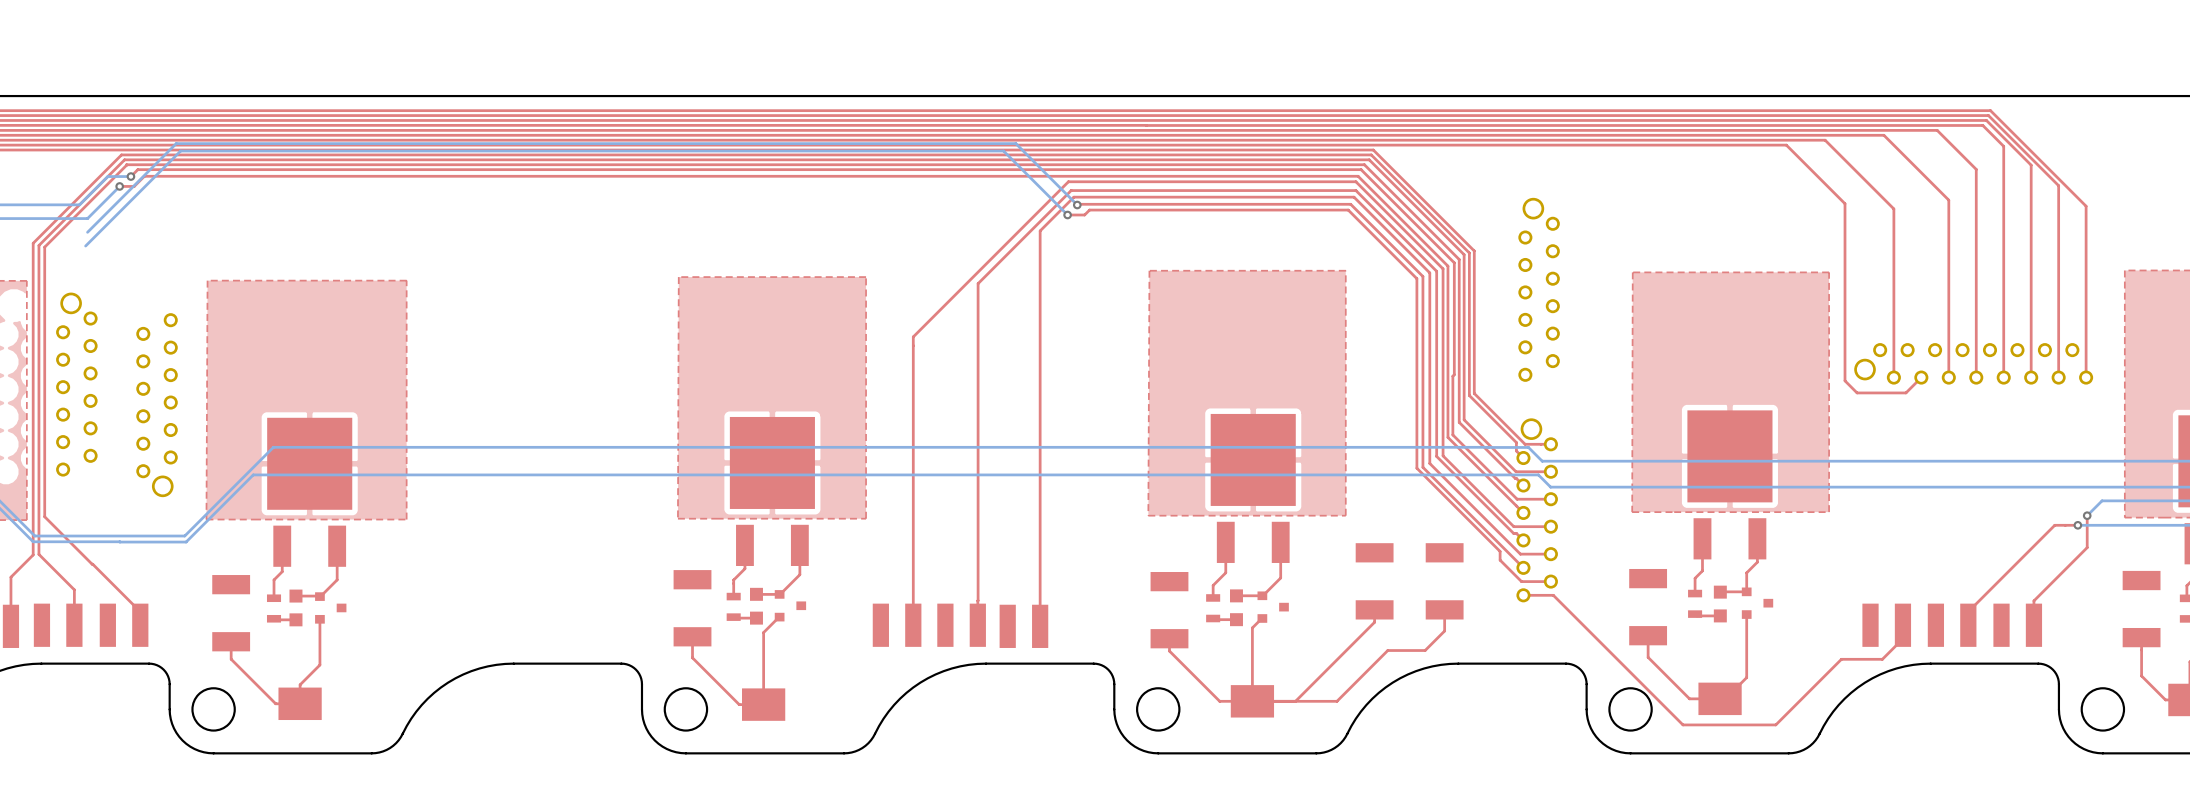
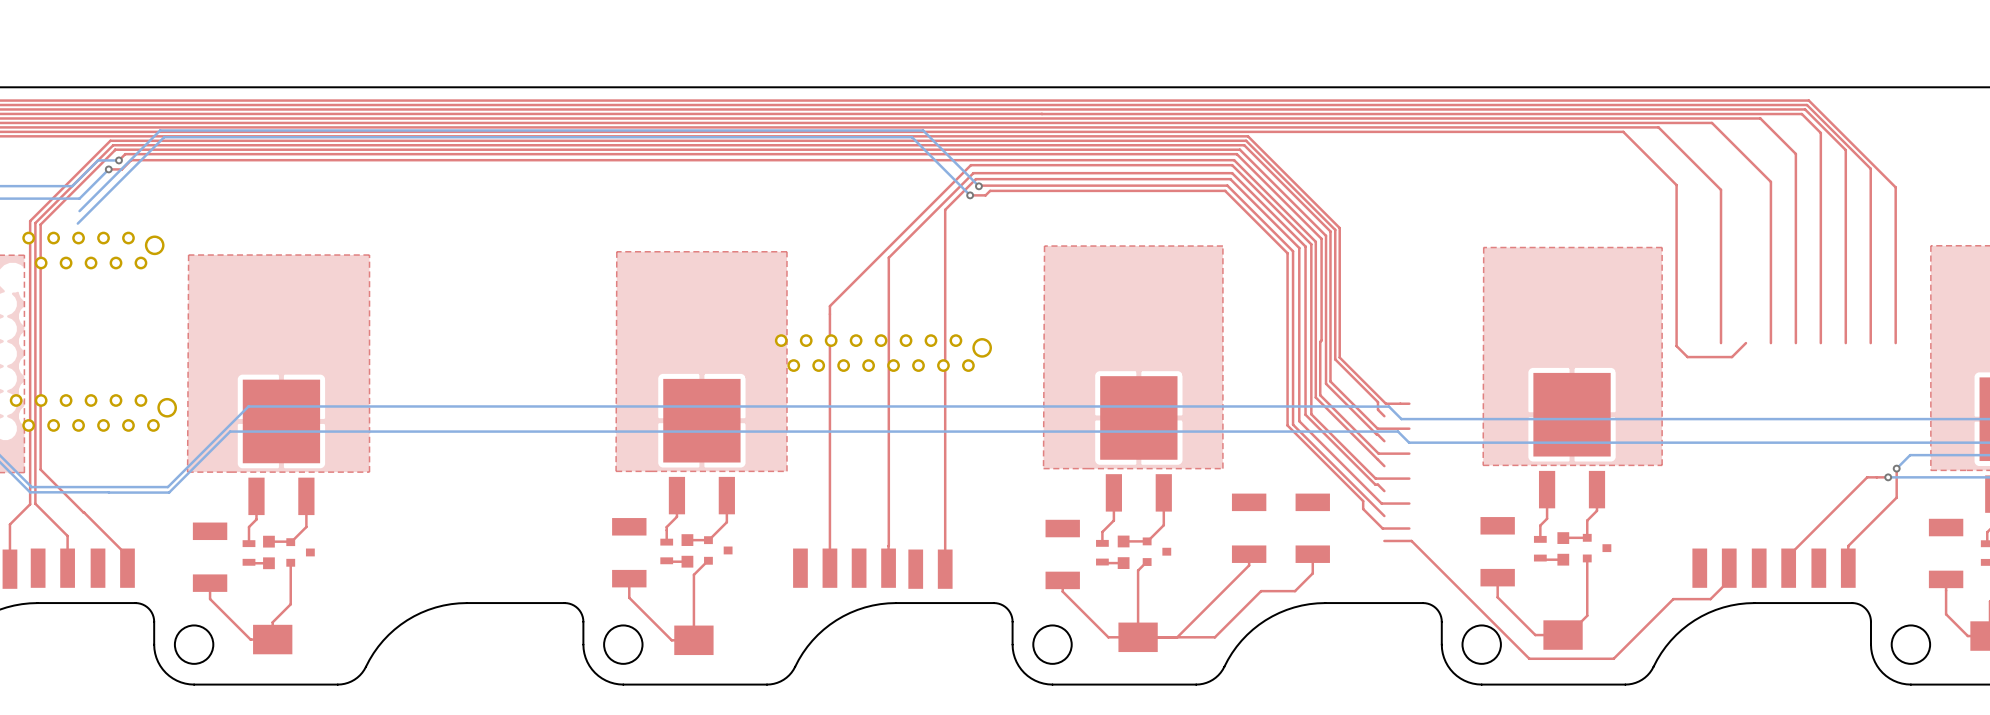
part: none -> (93, 250)
part: (1539, 289) -> none
part: (1973, 363) -> none
part: (76, 384) -> none
part: none -> (883, 353)
part: (157, 405) -> none
part: none -> (93, 412)
part: (1537, 510) -> none

